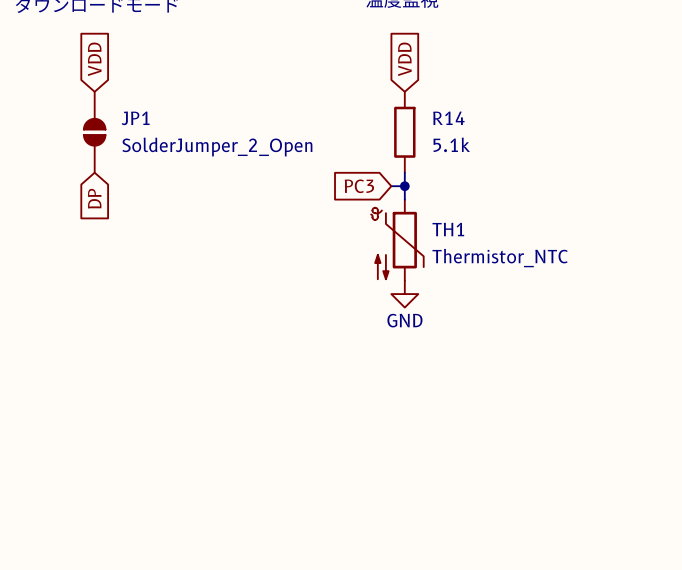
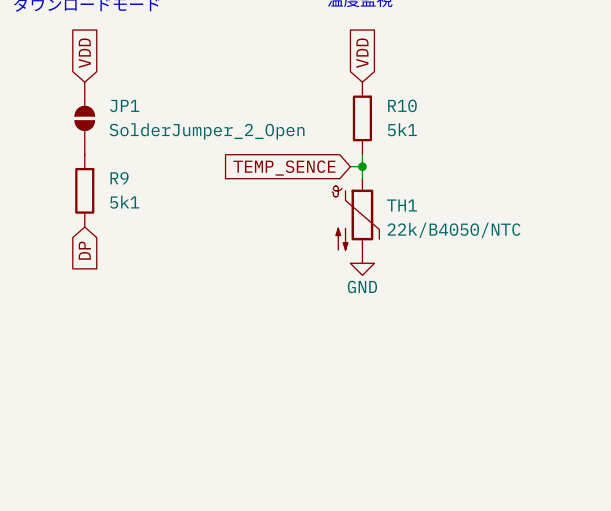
R14 name: R14 (448, 118) -> R10 (402, 105)
R14 value: 5.1k (451, 144) -> 5k1 (402, 129)
global label: PC3 (359, 186) -> TEMP_SENCE (284, 168)
global label position: DP (94, 198) -> DP (84, 250)
R9: none -> 5k1 (84, 190)
TH1 value: Thermistor_NTC (500, 258) -> 22k/B4050/NTC (454, 230)

